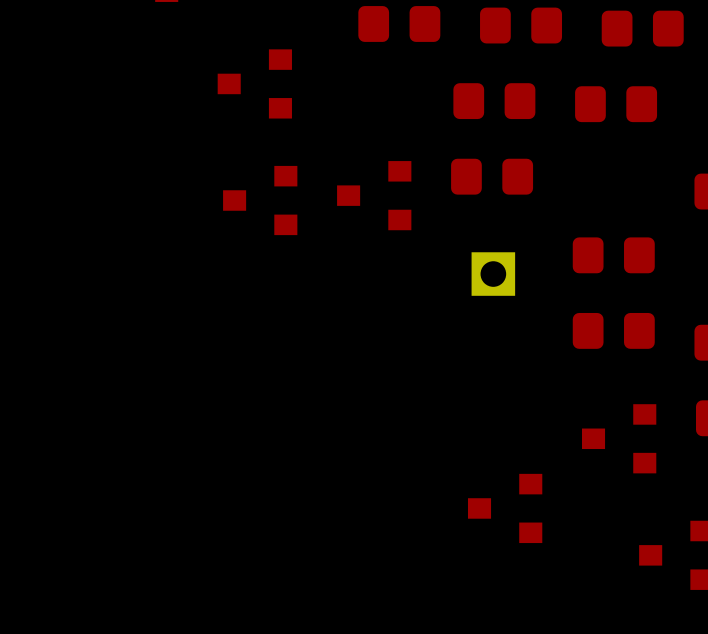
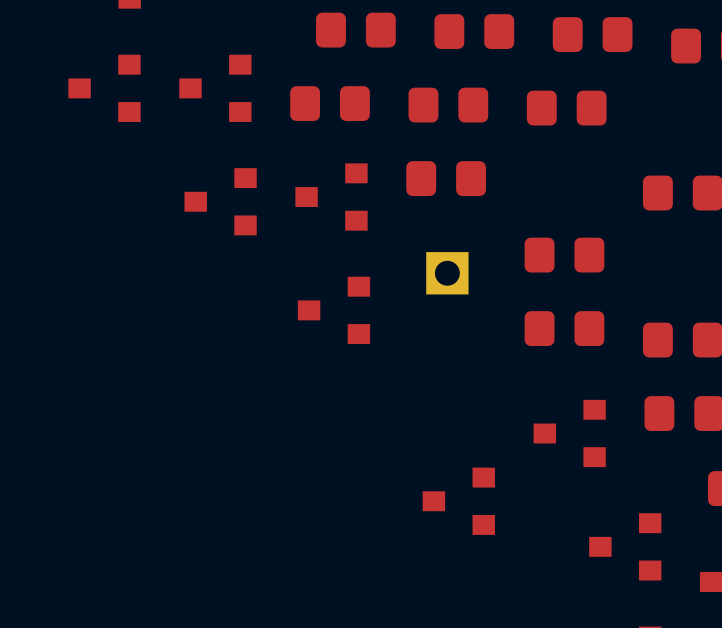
part: none -> (104, 88)
part: none -> (330, 103)
part: none -> (334, 310)

